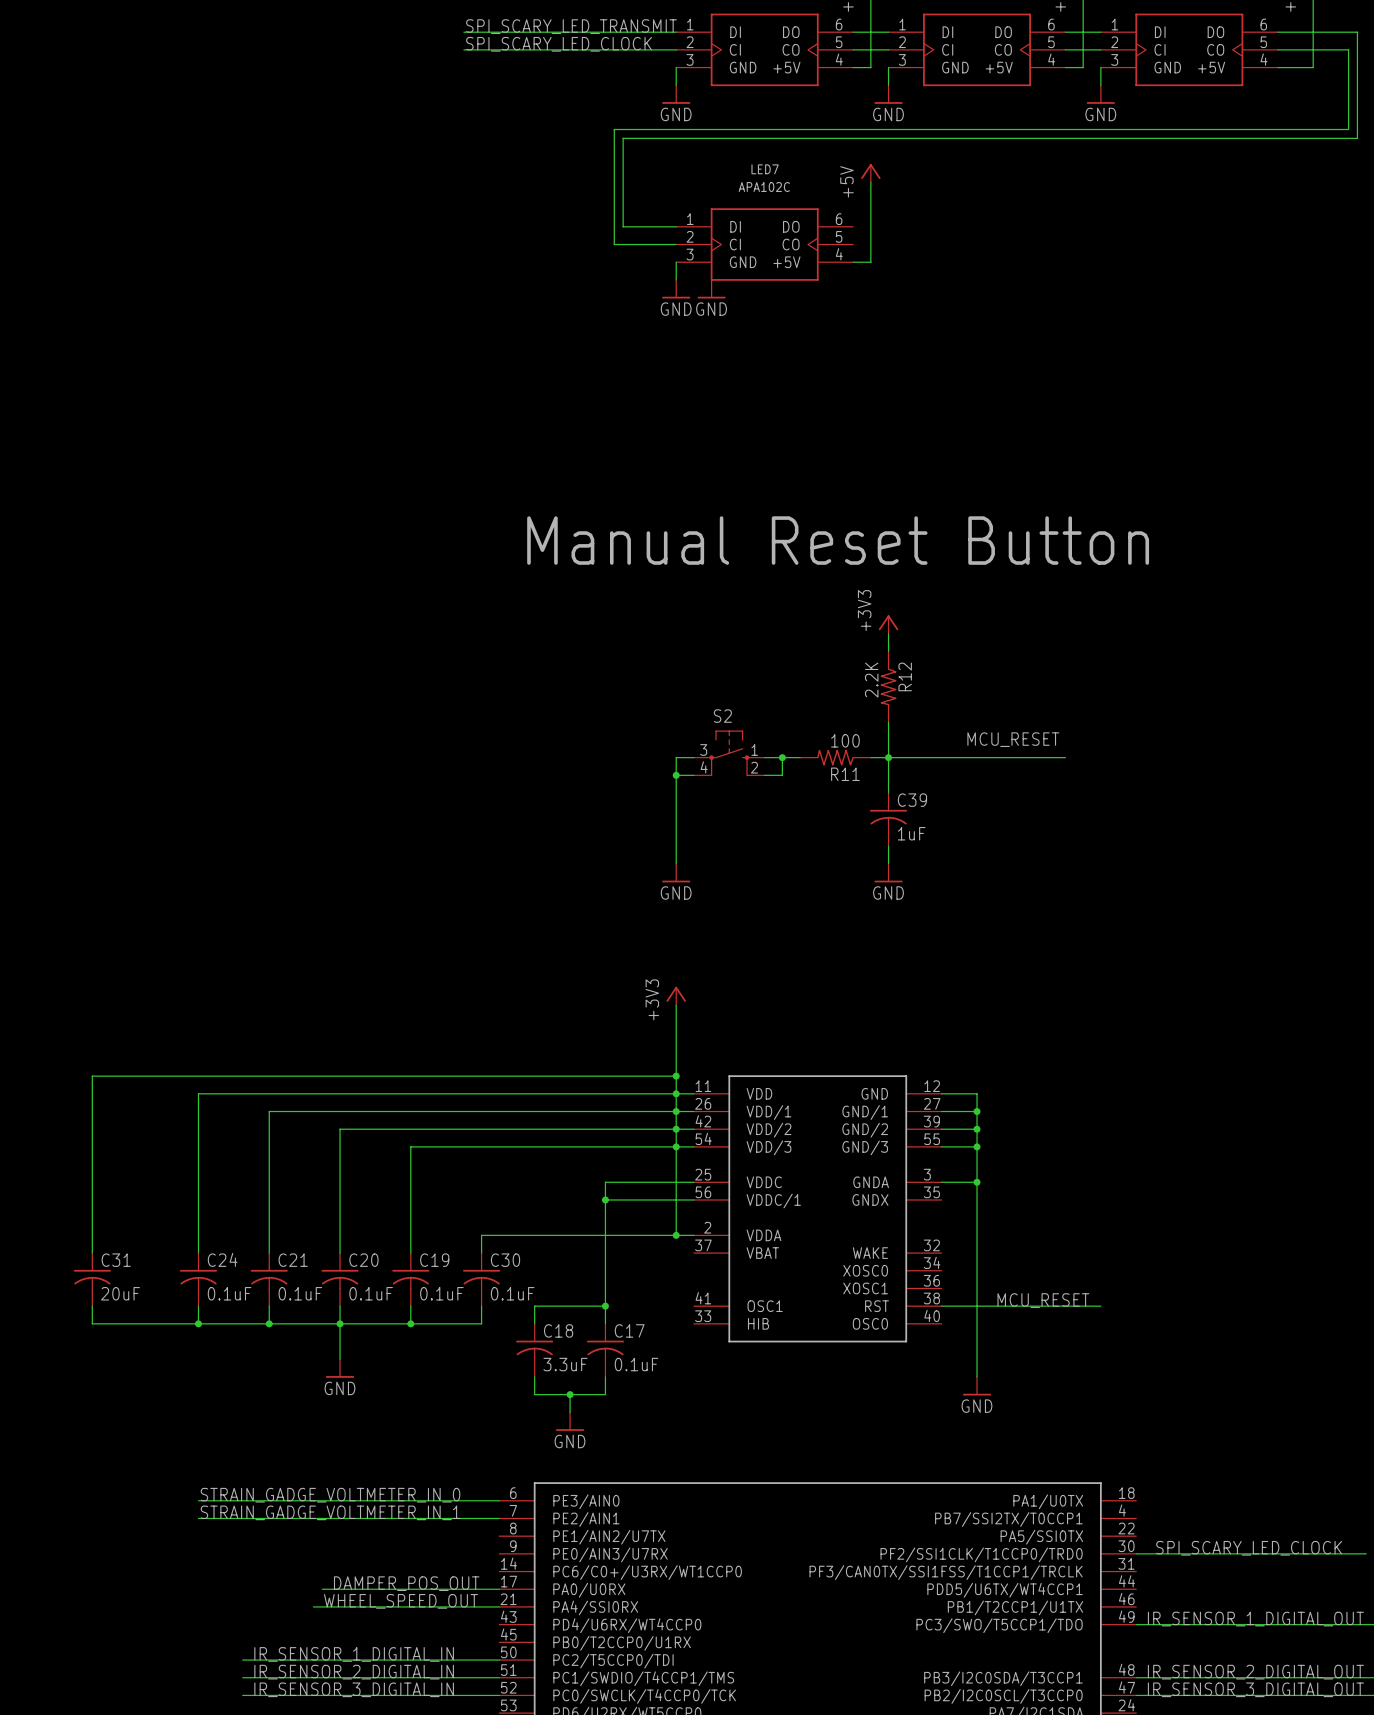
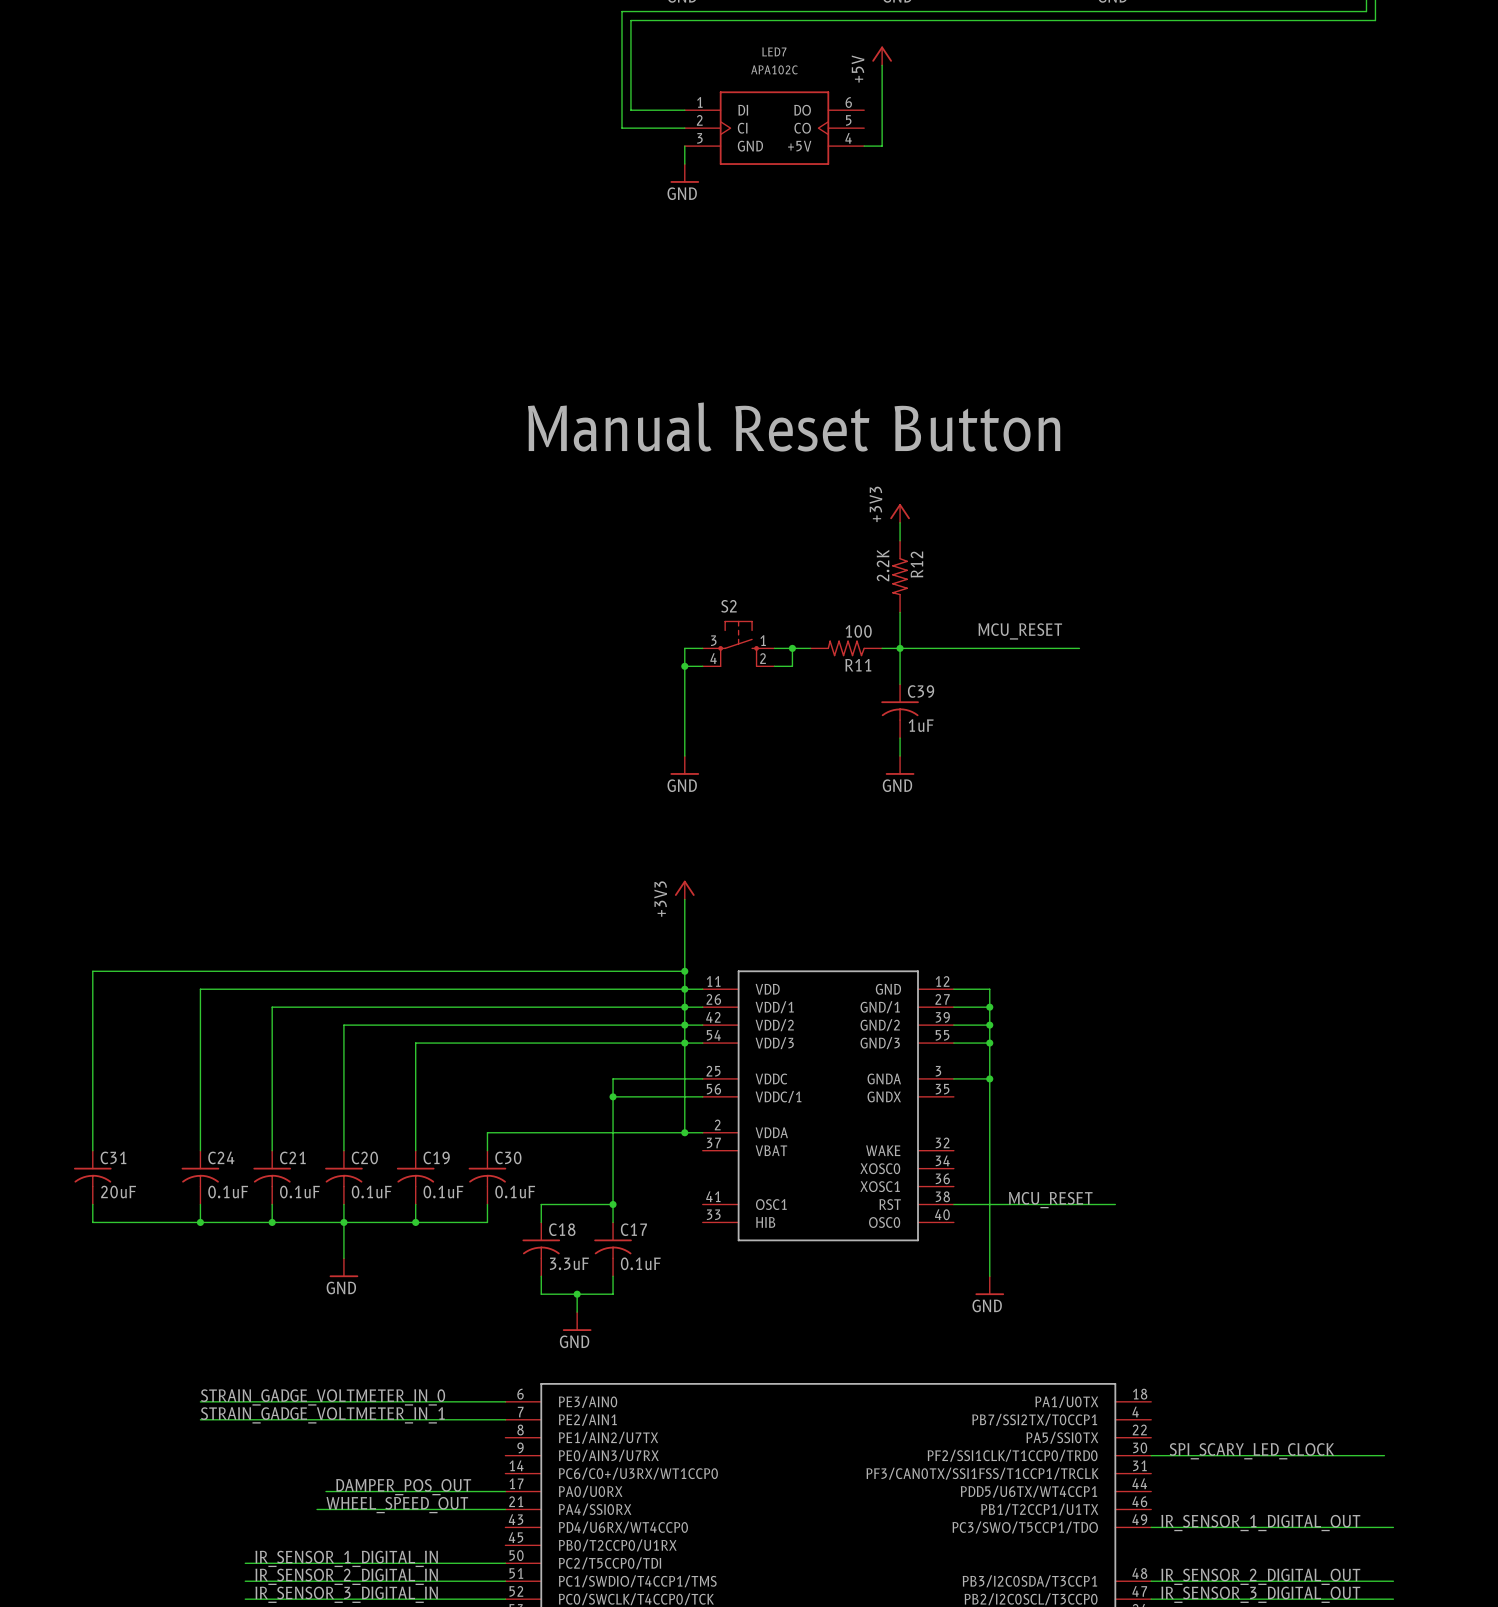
power symbol: GND (711, 289) -> none

